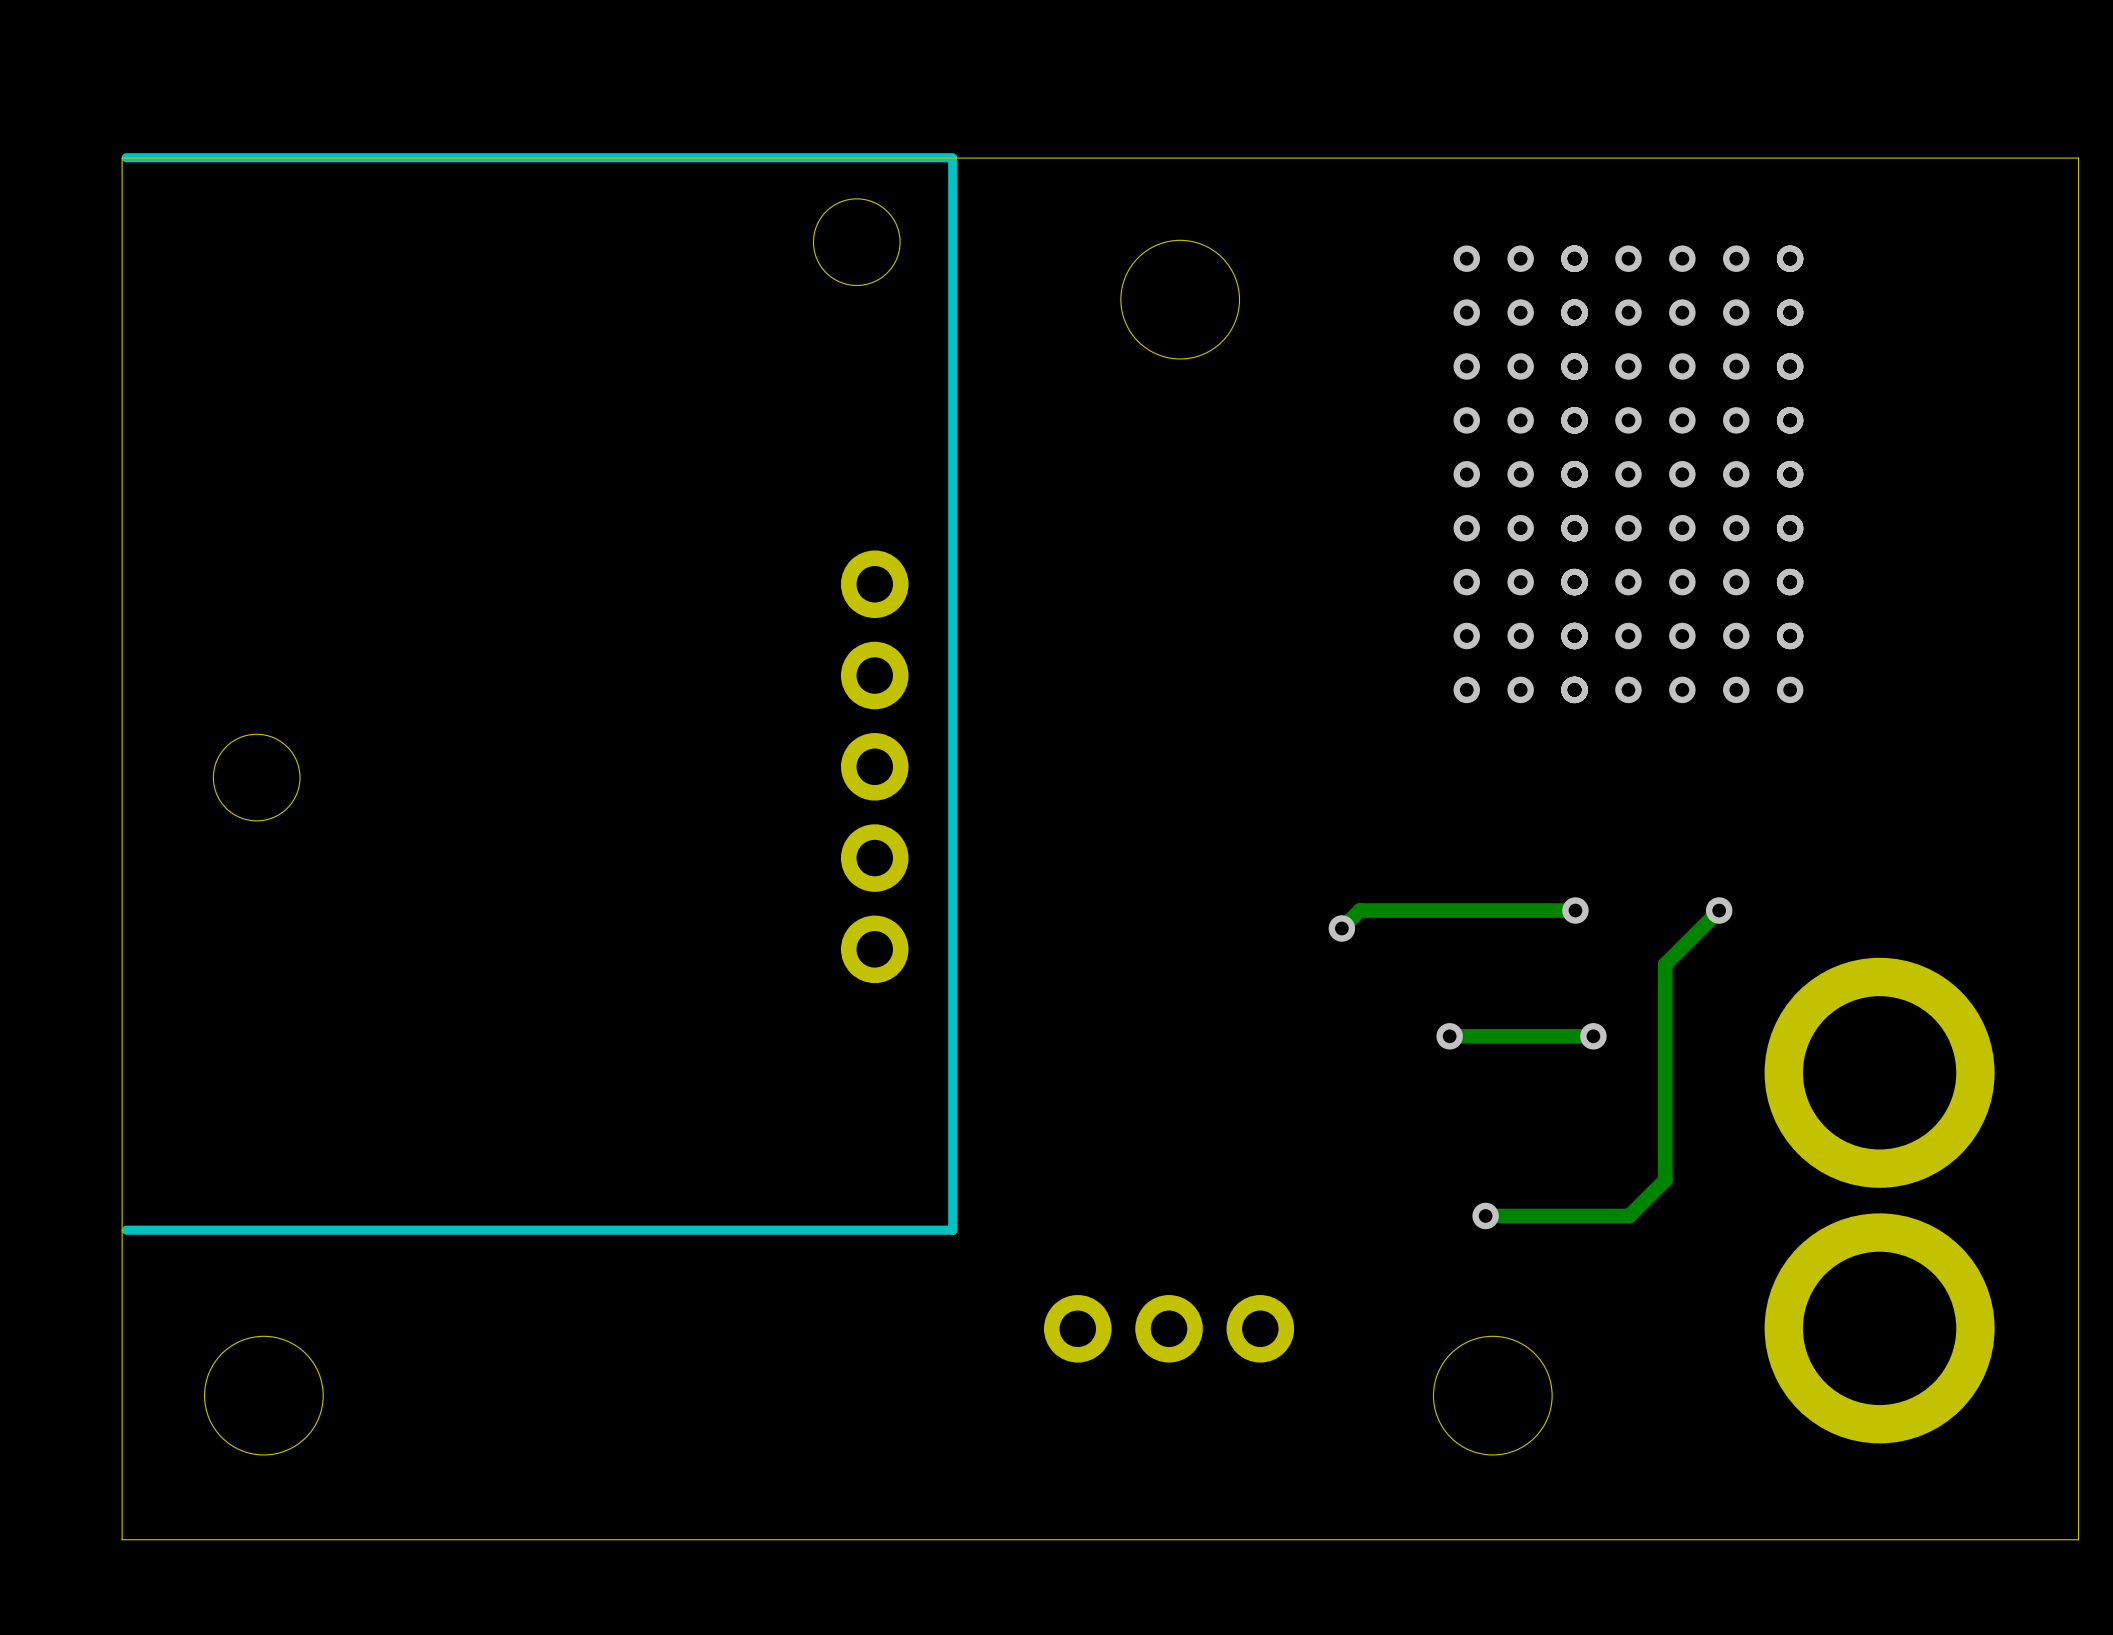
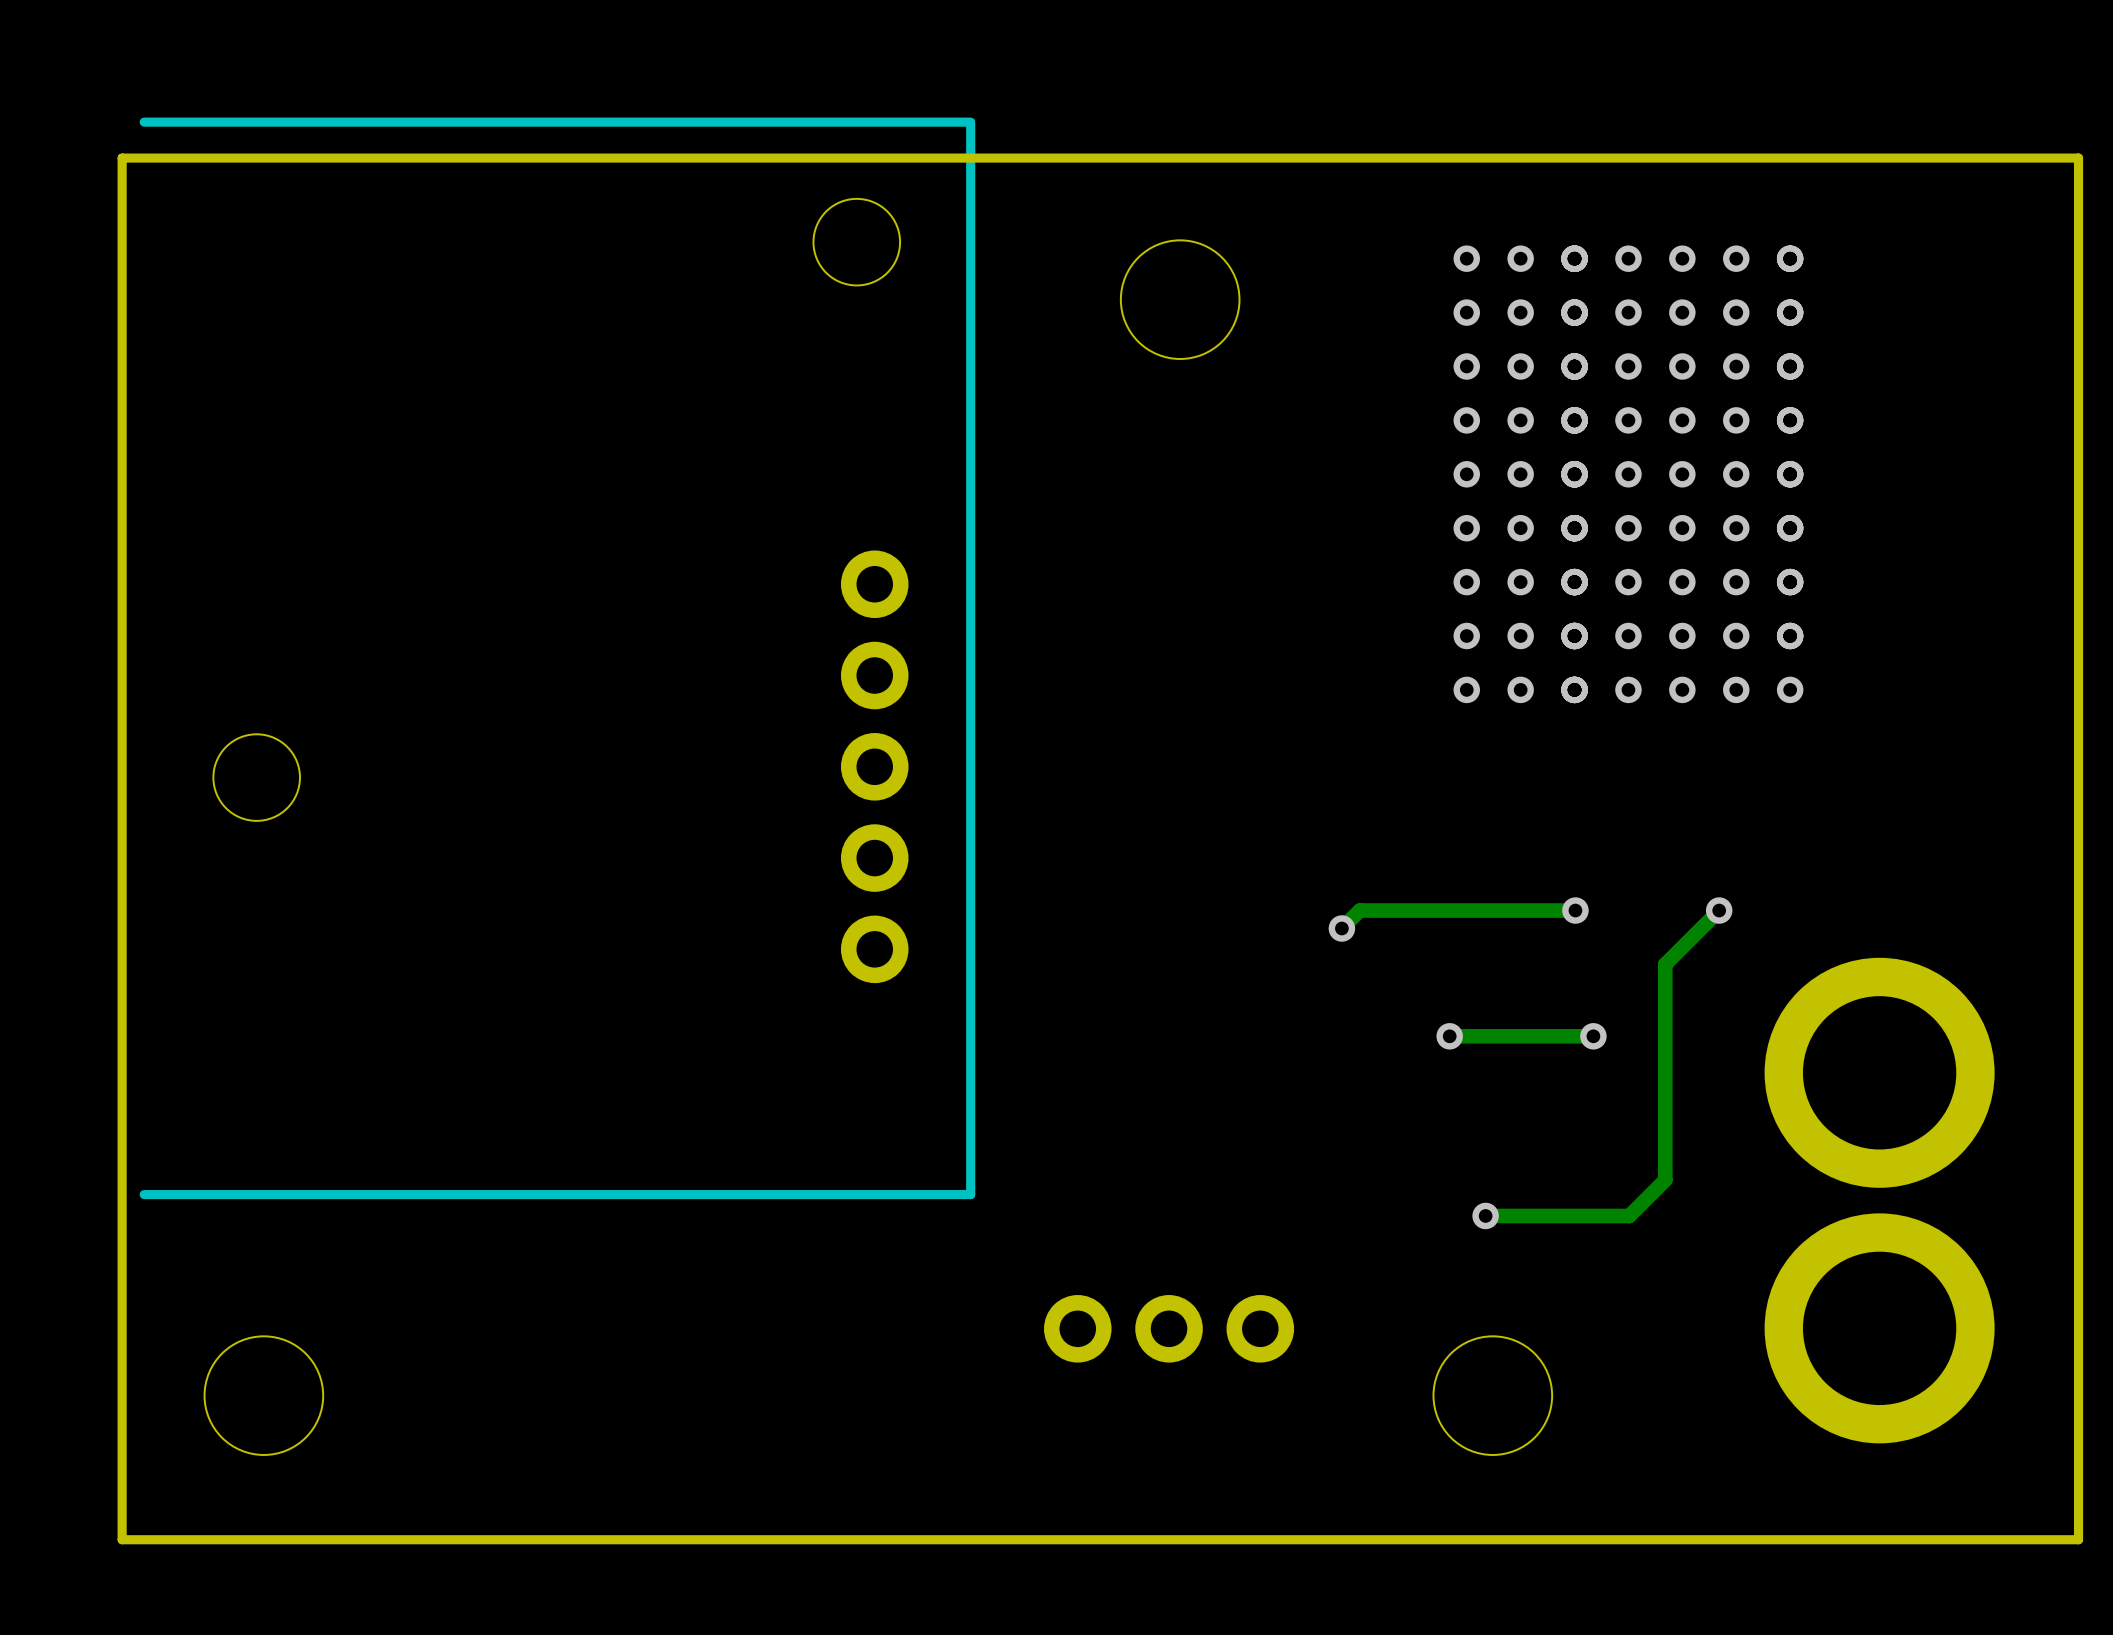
line: (952, 157) (126, 157) -> (970, 122) (144, 122)
board edge width: thin (2078, 158) (122, 158) (122, 1539) (2078, 1539) (2078, 158) -> thick (2078, 158) (122, 158) (122, 1539) (2078, 1539) (2078, 158)
line: (952, 159) (952, 1230) (126, 1230) -> (970, 123) (970, 1194) (144, 1194)

